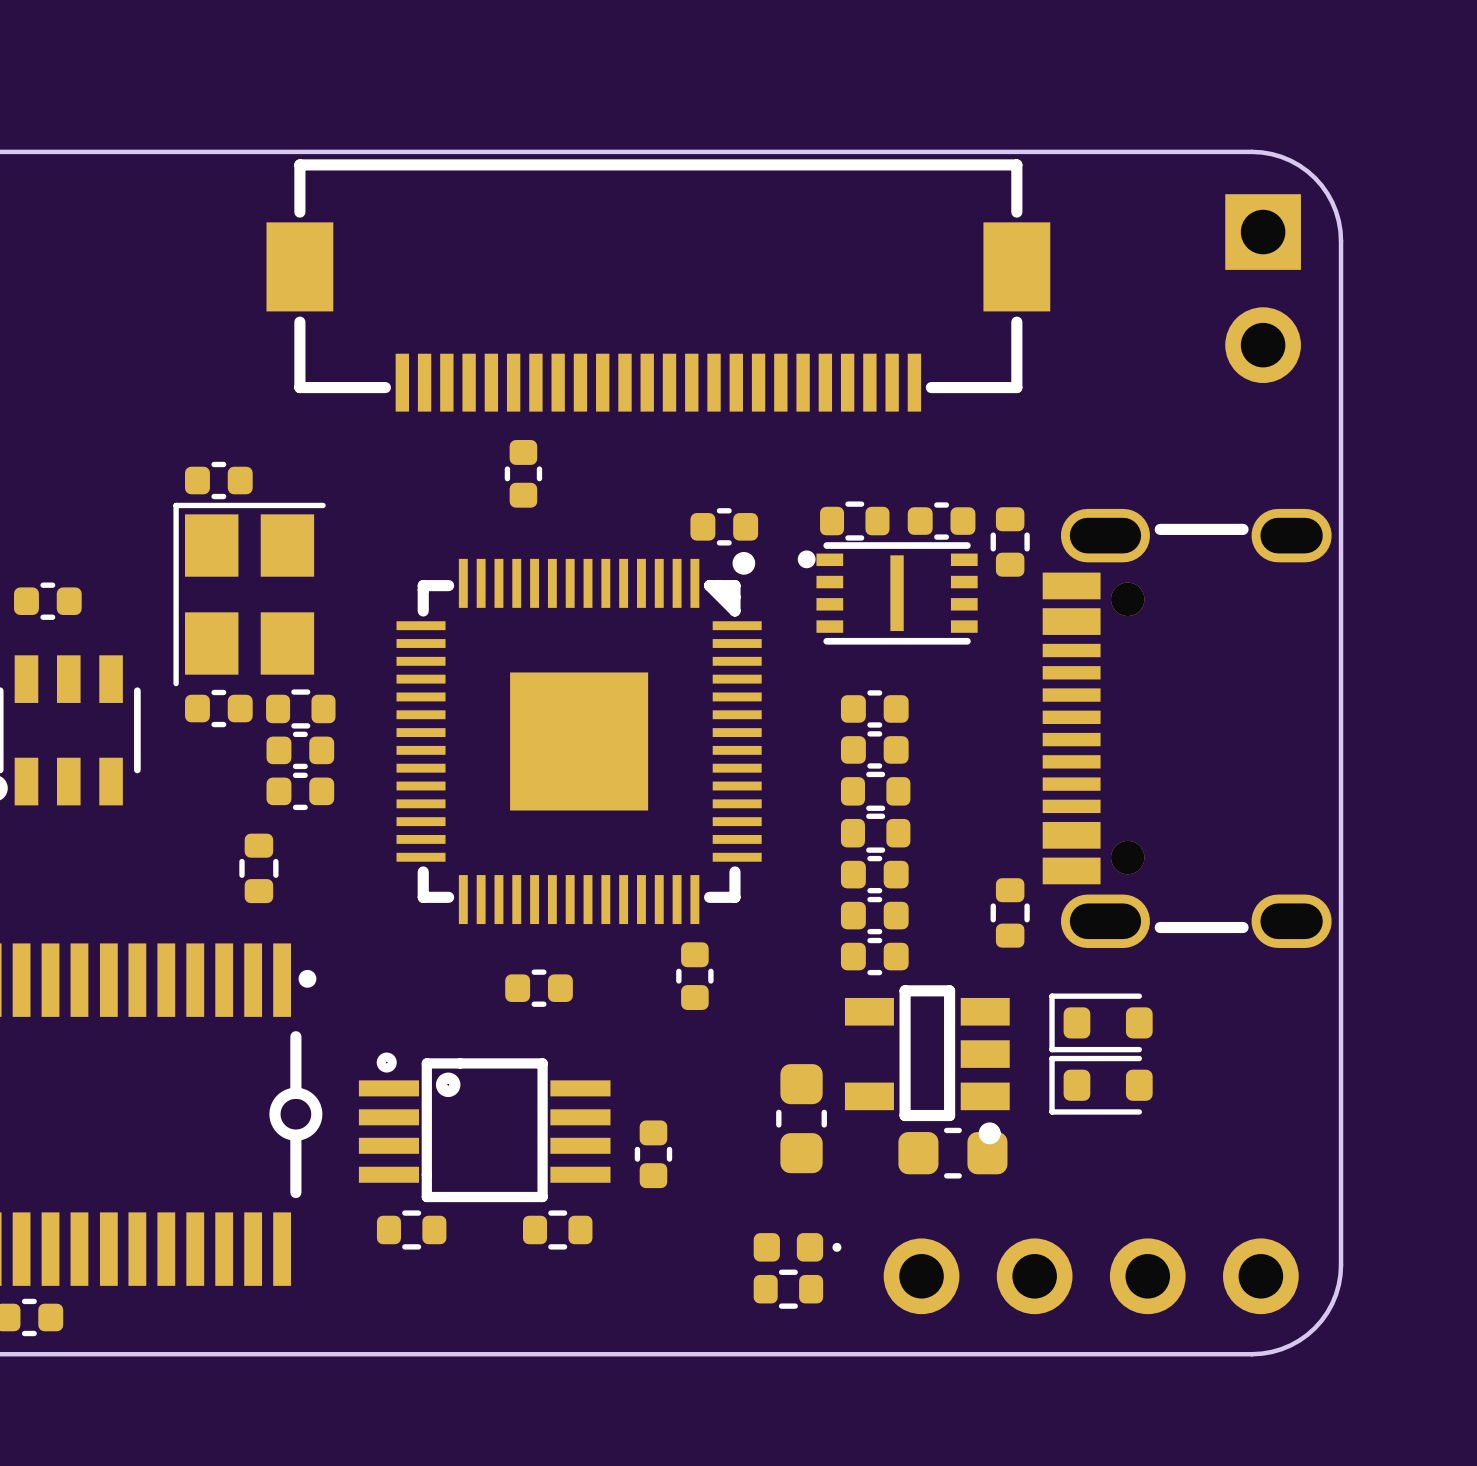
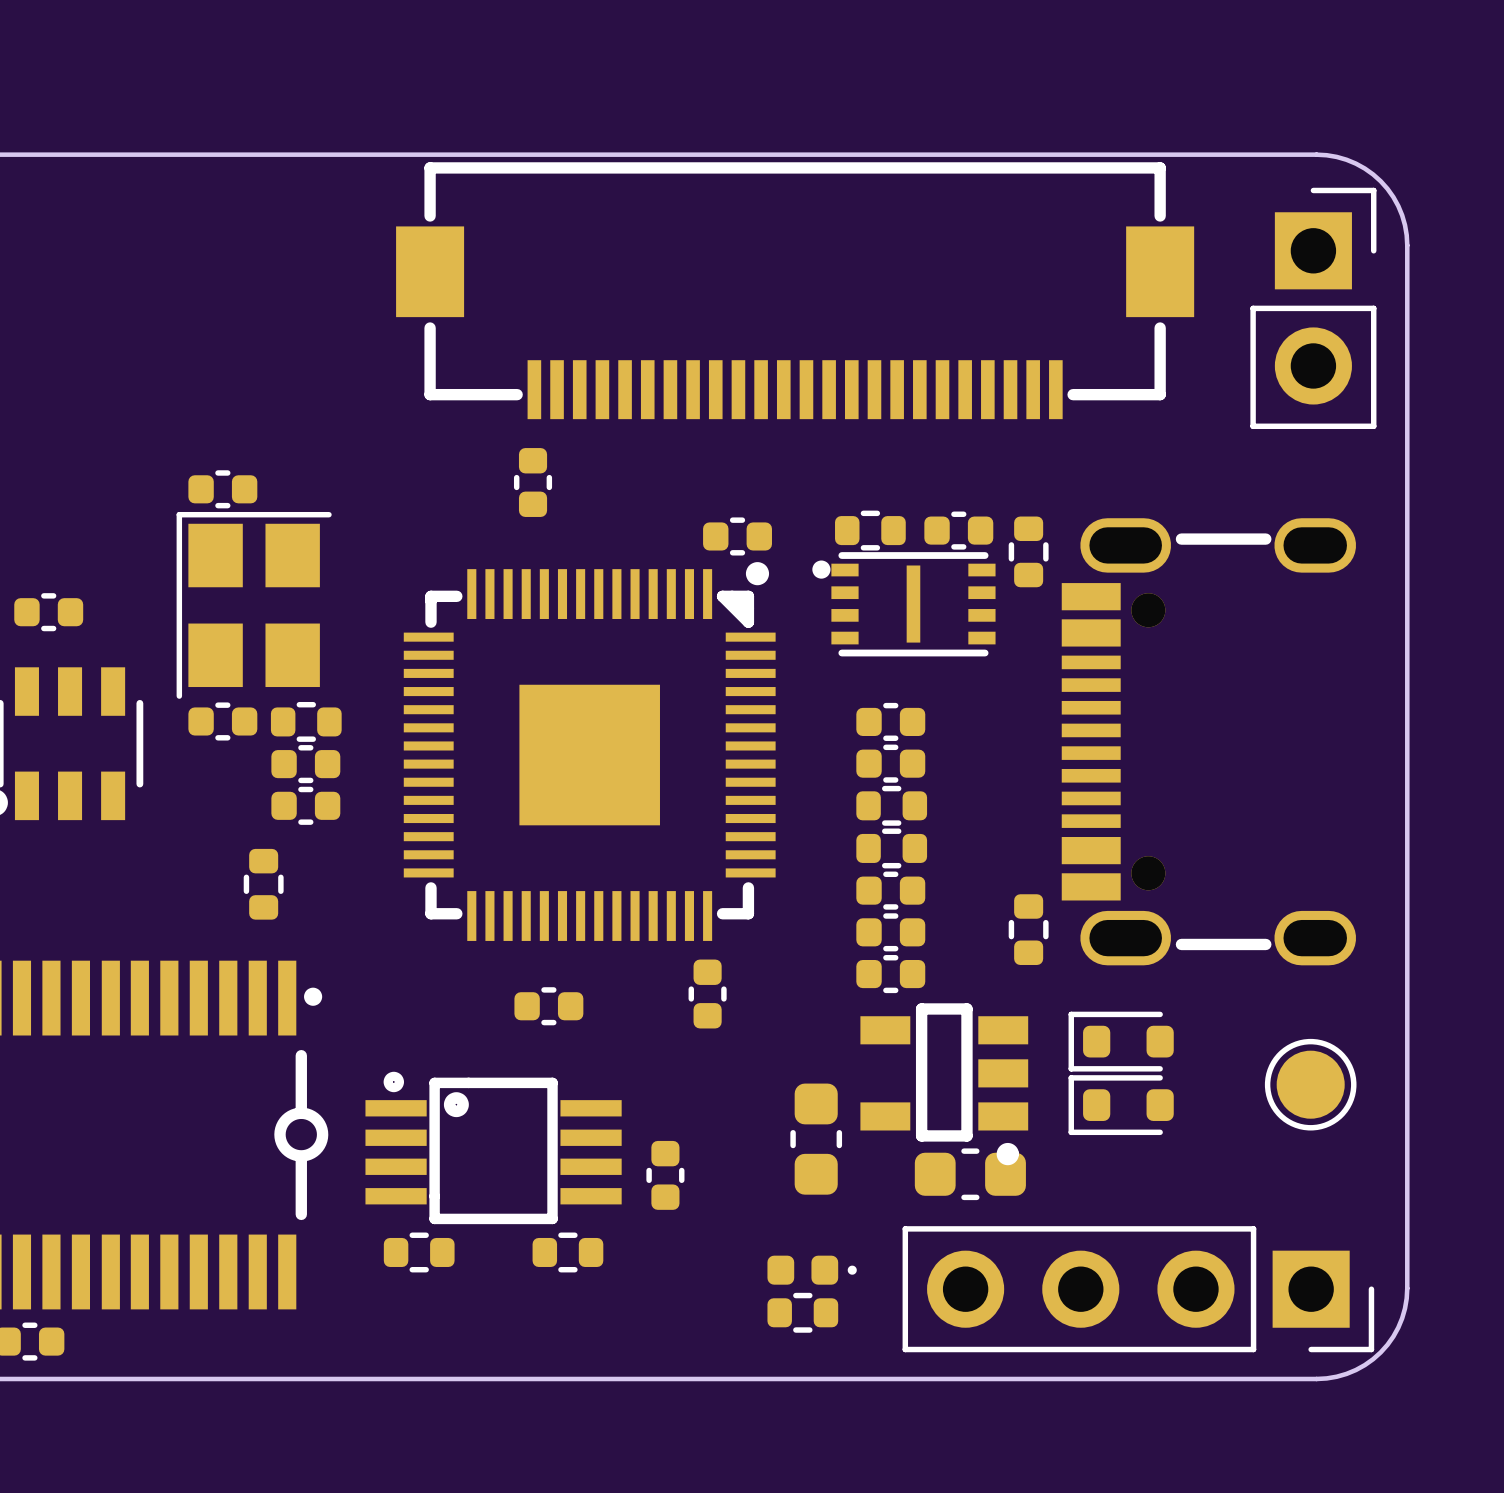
board edge: (1251, 151) (1271, 154) (1290, 160) (1314, 177) (1327, 193) (1336, 211) (1341, 240) (1340, 1275) (1332, 1303) (1314, 1328) (1290, 1345) (1271, 1351) (1251, 1354) -> (1274, 154) (1326, 155) (1346, 159) (1364, 168) (1380, 181) (1393, 197) (1402, 215) (1407, 245) (1406, 1298) (1402, 1318) (1393, 1336) (1380, 1352) (1364, 1365) (1346, 1373) (1326, 1378) (1274, 1378)
part footprint: [1225, 194, 1301, 384] -> [1250, 187, 1377, 430]
part position: (658, 285) -> (795, 290)
part: none -> (1310, 1084)
part footprint: [883, 1238, 1299, 1315] -> [902, 1226, 1375, 1353]

